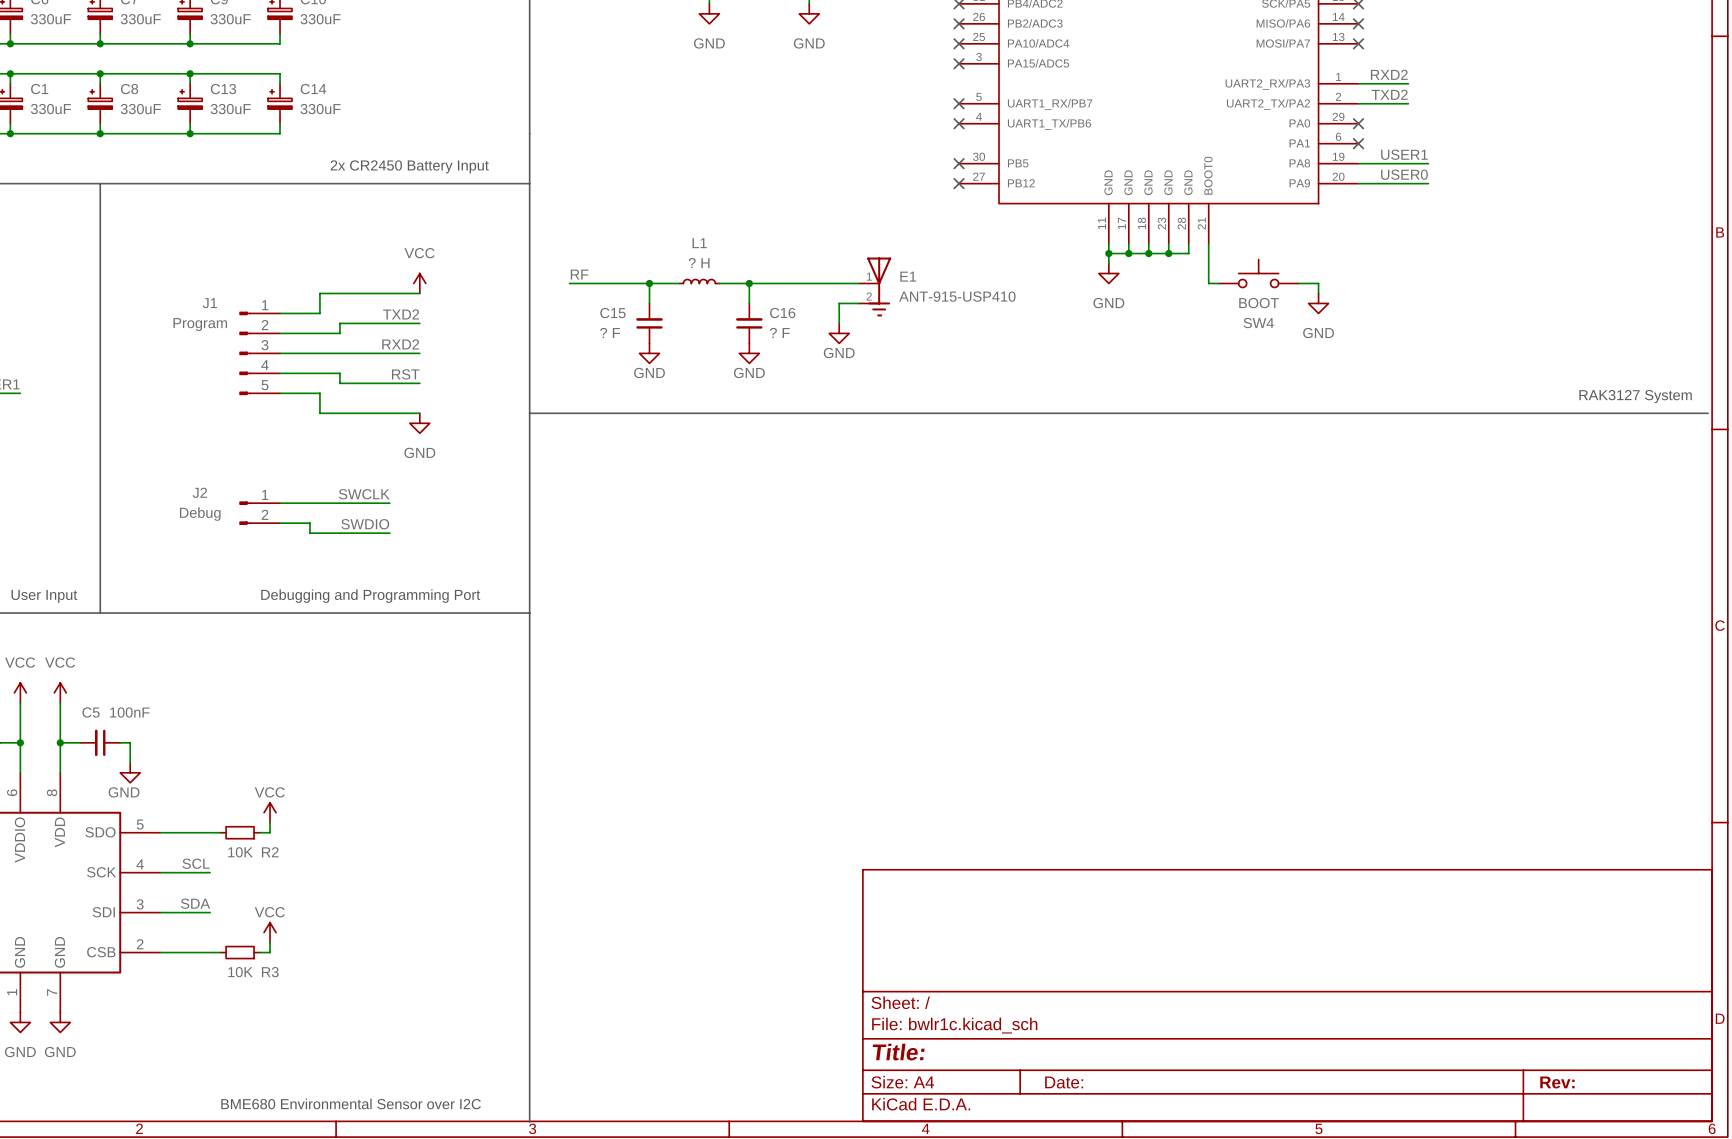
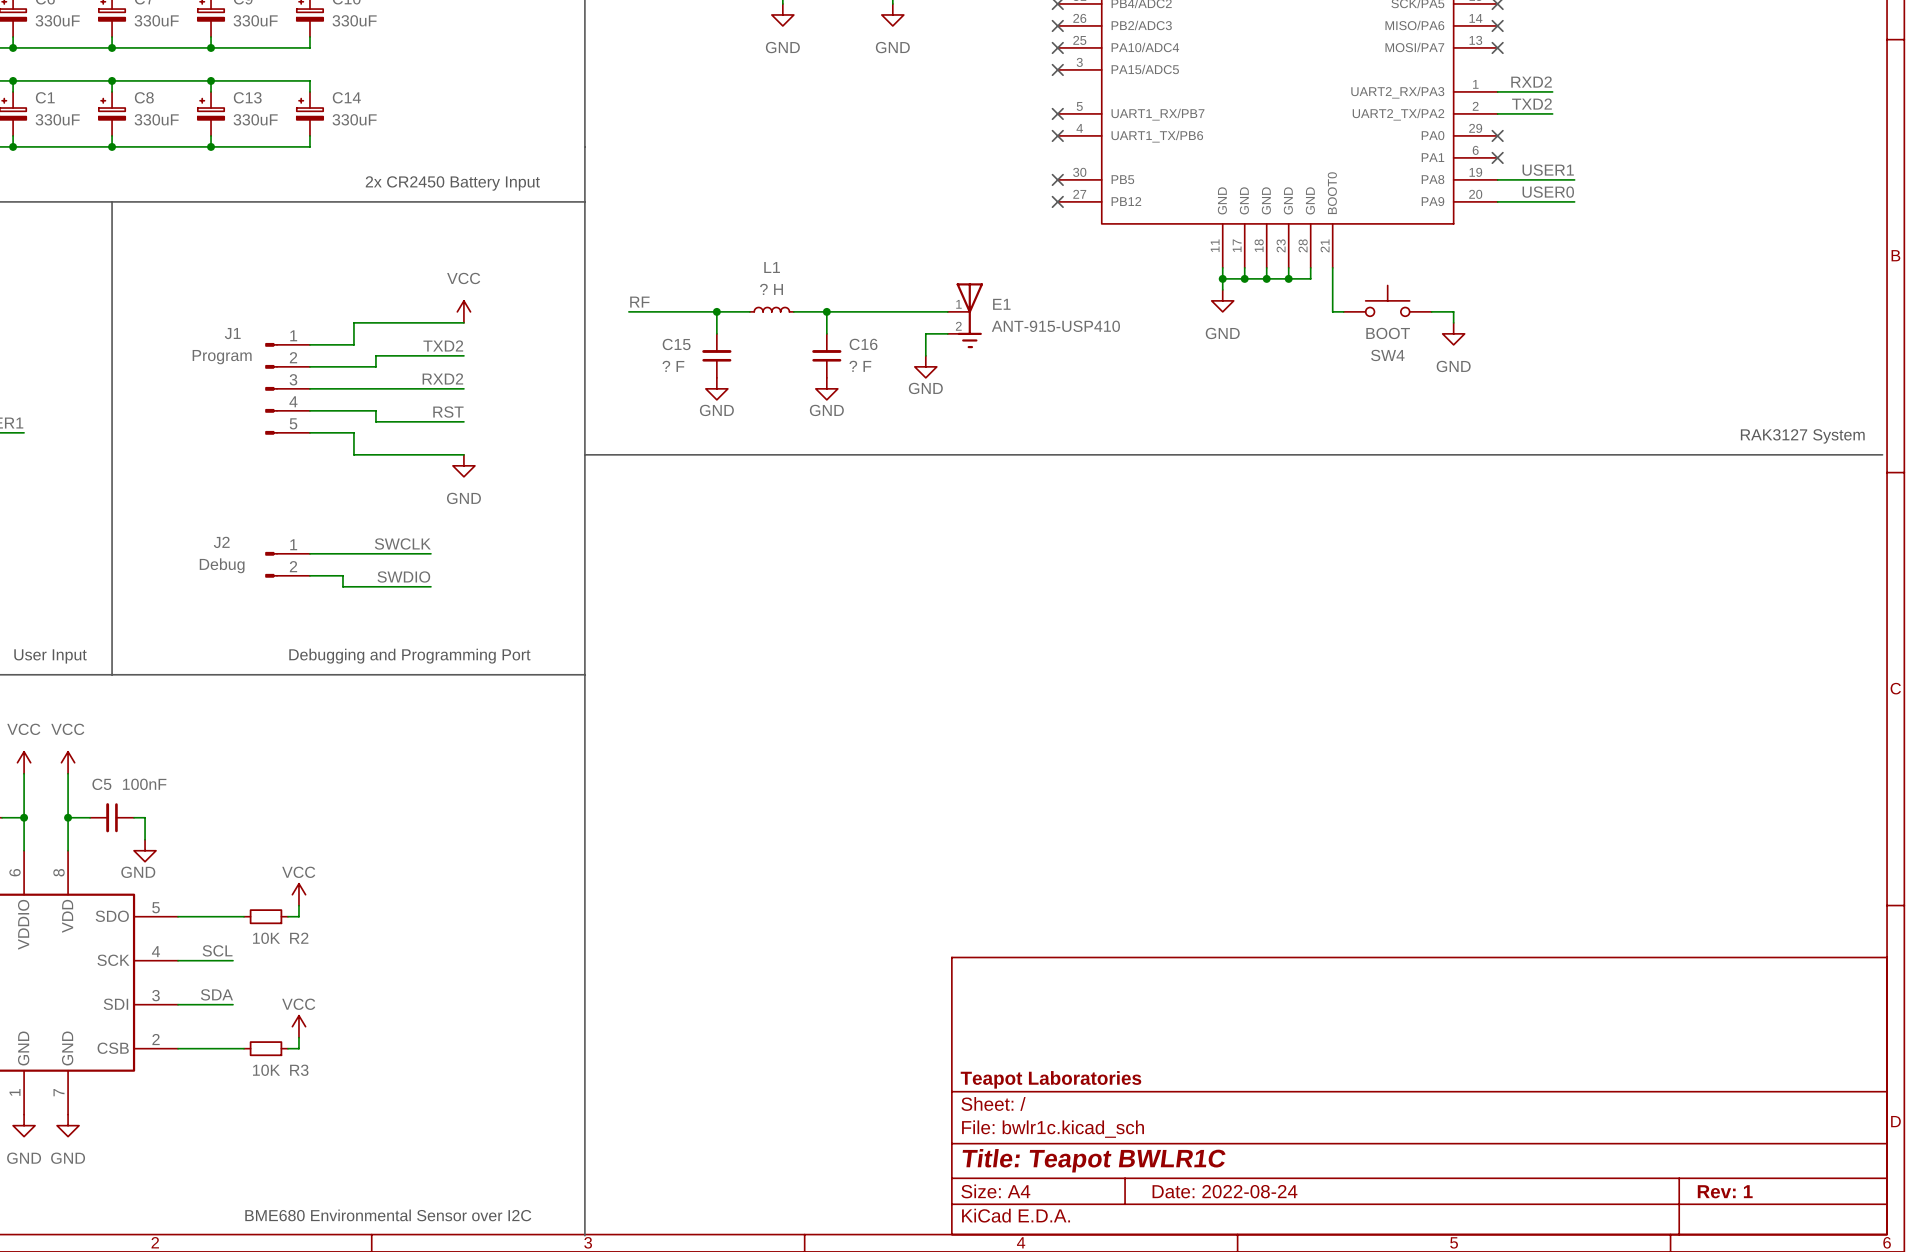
title block: none -> Teapot Laboratories (1050, 1079)
title block: Title: (898, 1052) -> Title: Teapot BWLR1C (1094, 1160)
title block: Date: (1064, 1082) -> Date: 2022-08-24 (1224, 1191)
title block: Rev: (1557, 1082) -> Rev: 1 (1725, 1191)

